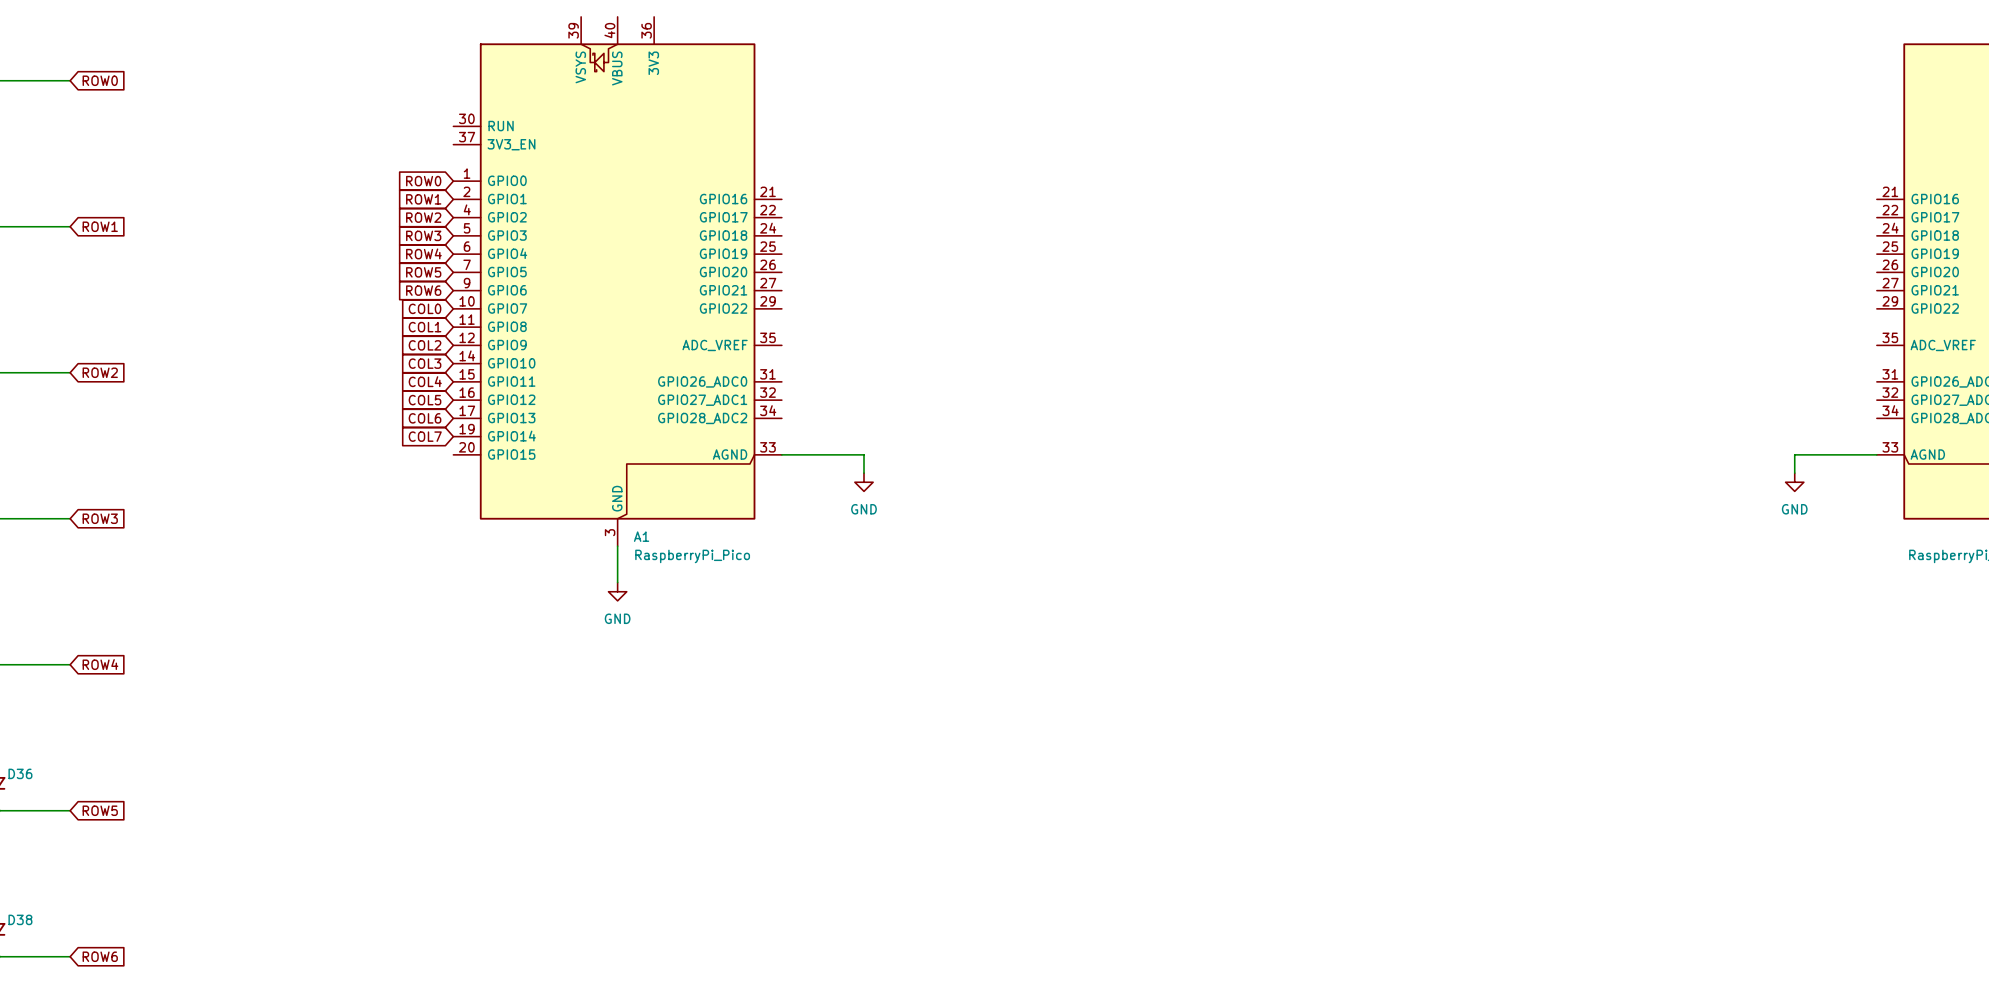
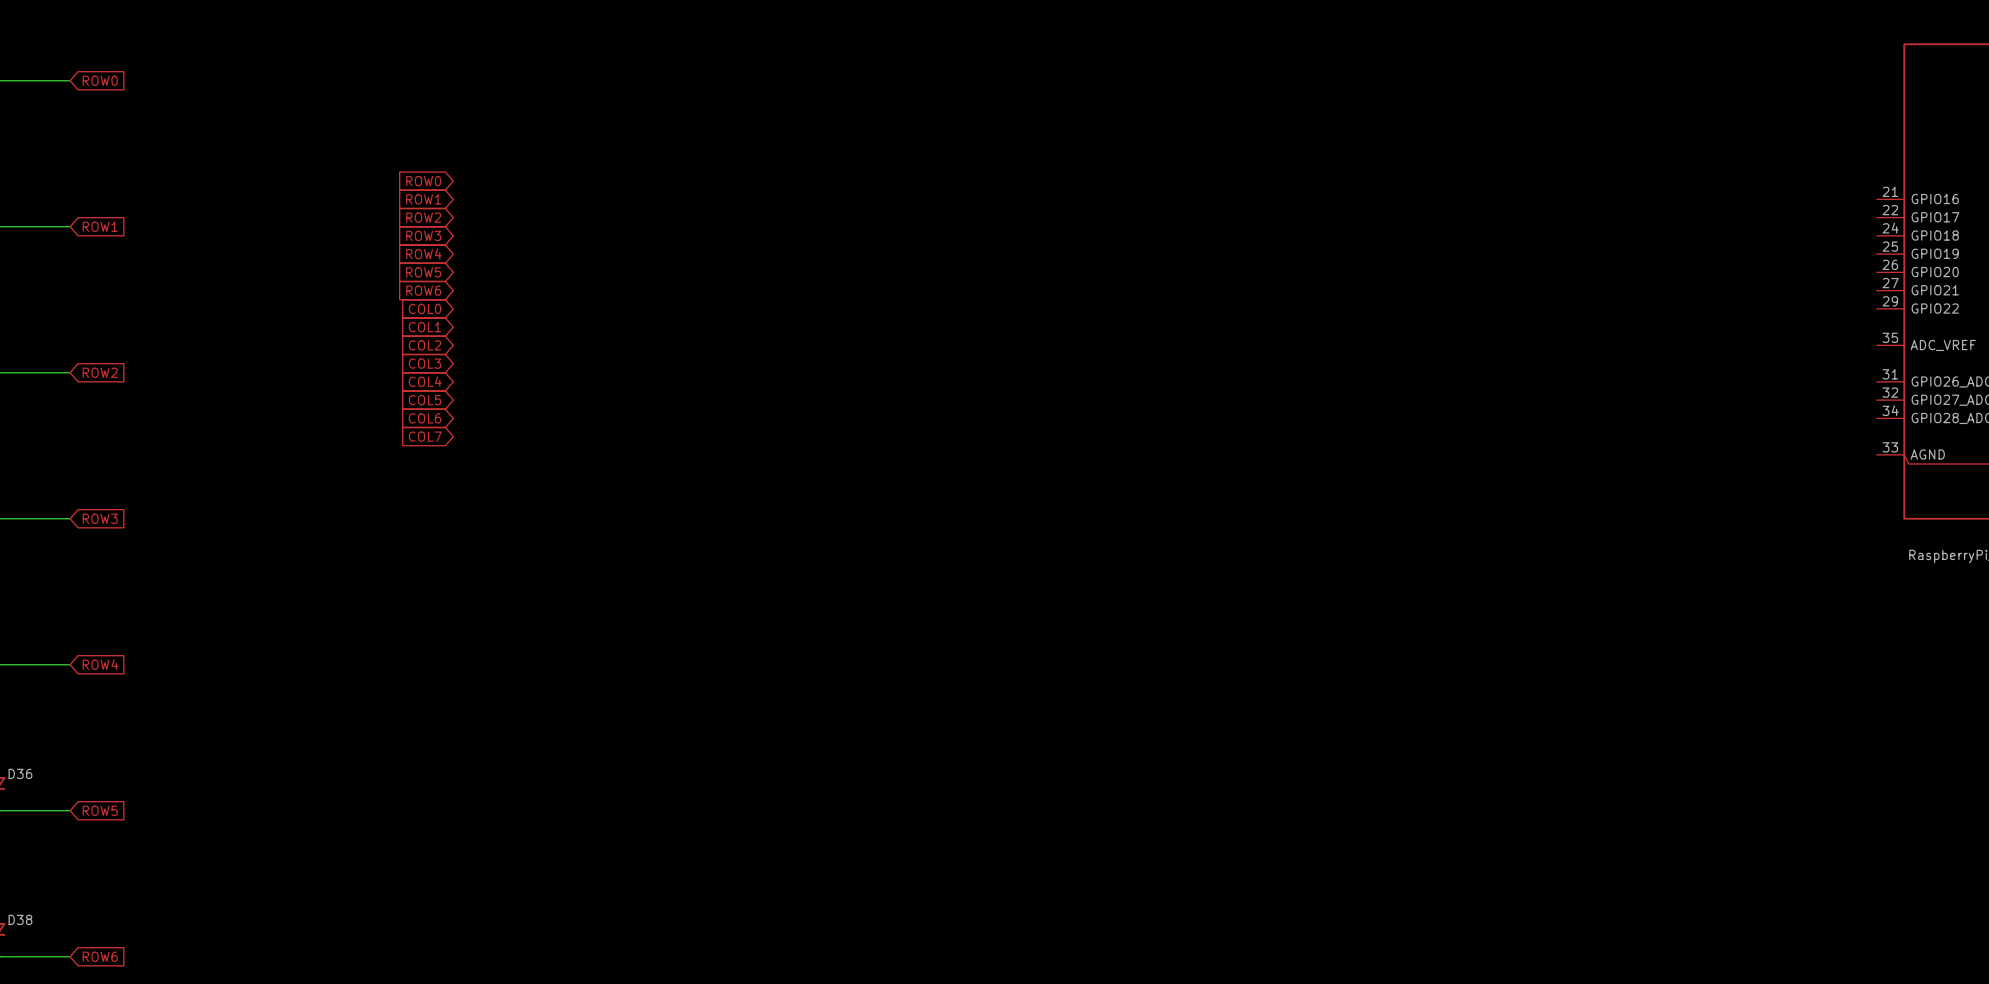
A1: RaspberryPi_Pico (617, 281) -> none
wire: (781, 454) (863, 454) (863, 473) -> none
wire: (1876, 454) (1794, 454) (1794, 473) -> none
power symbol: GND (863, 482) -> none
power symbol: GND (1794, 482) -> none
wire: (617, 546) (617, 582) -> none
power symbol: GND (617, 591) -> none

